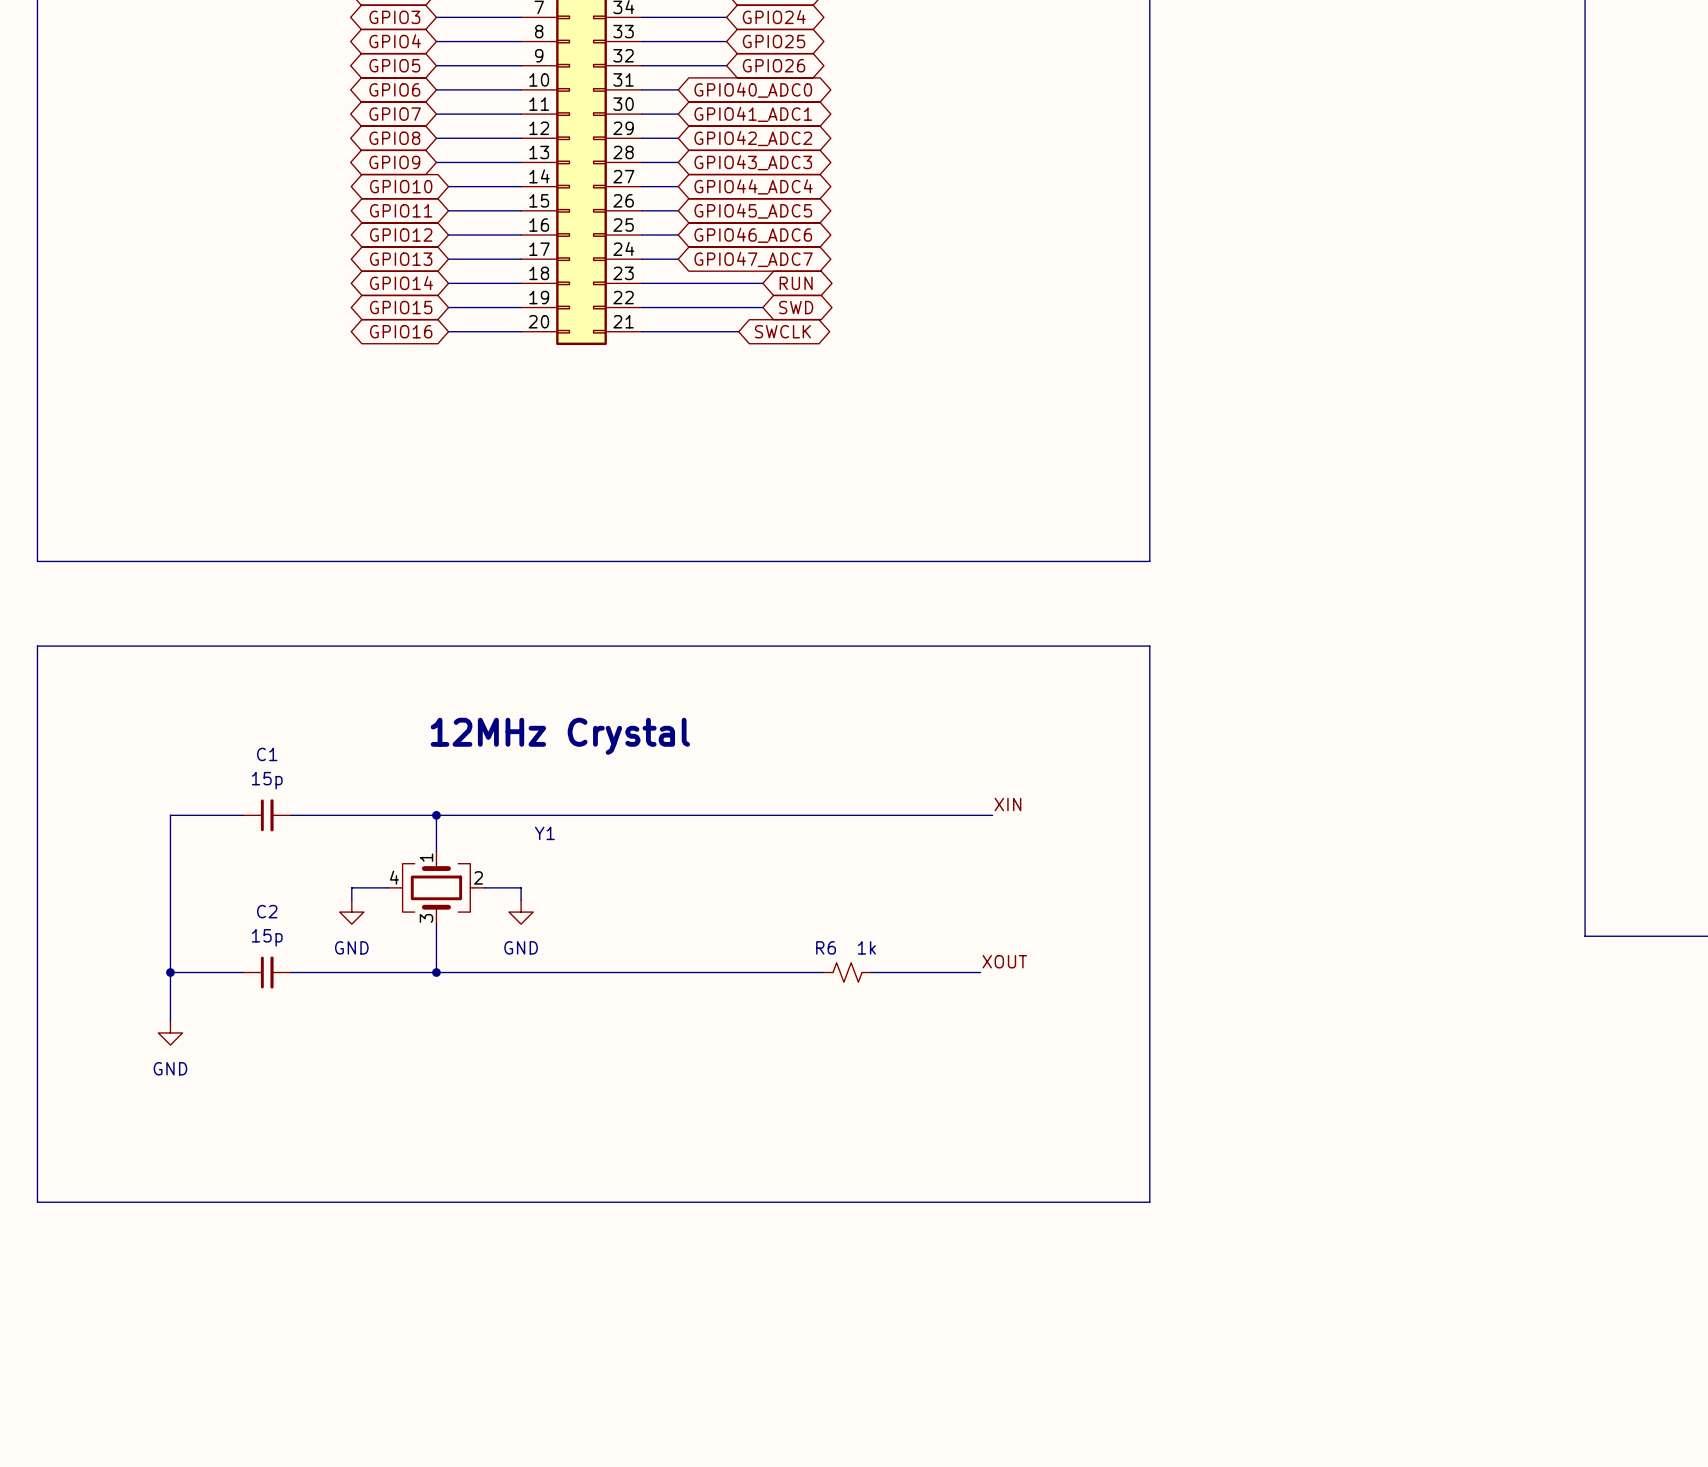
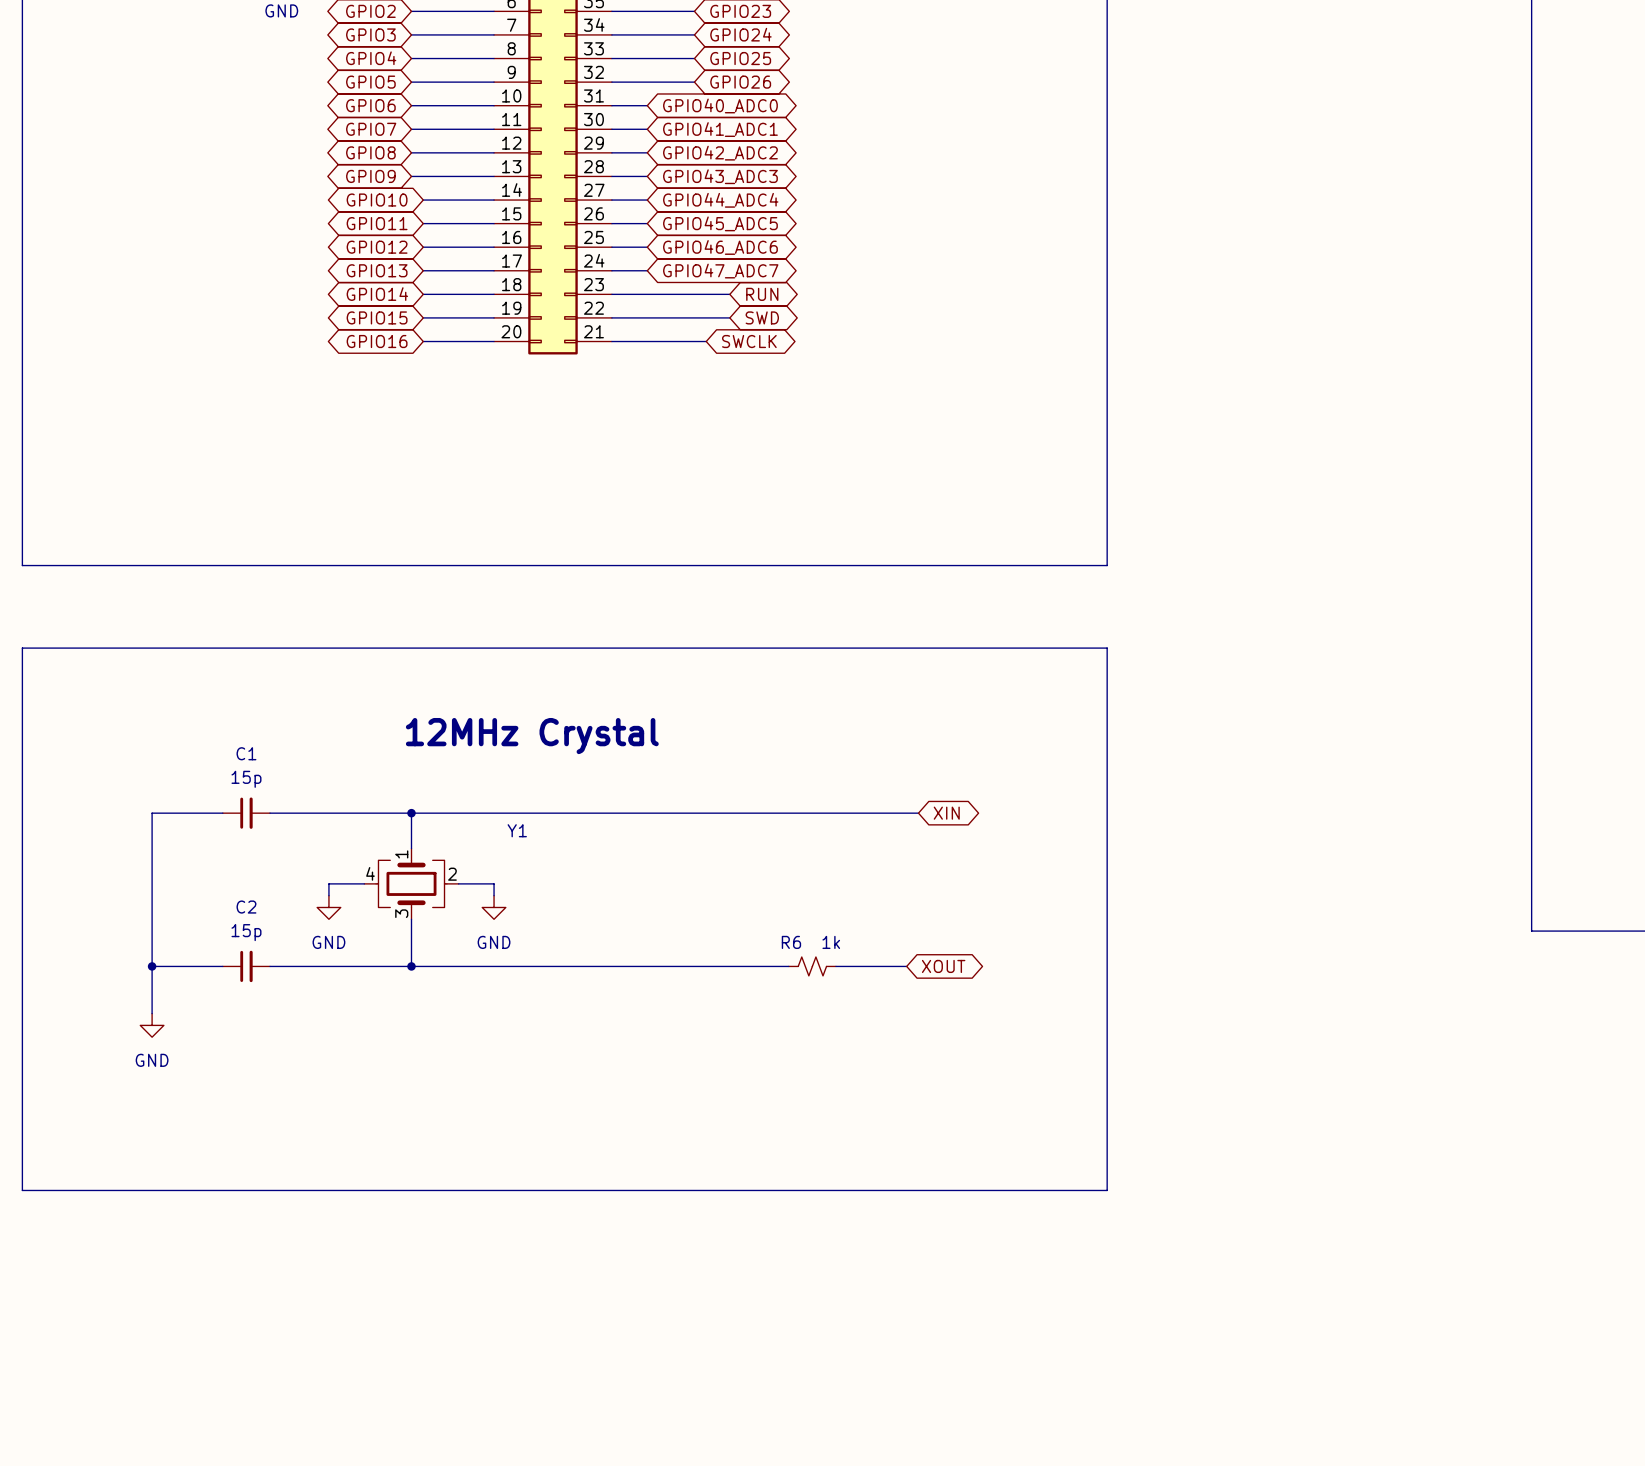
label: XIN (1007, 804) -> none
wire: (956, 815) (992, 815) -> none
global label: none -> XIN (946, 813)
label: XOUT (1004, 961) -> none
wire: (944, 972) (980, 972) -> none
global label: none -> XOUT (943, 966)

